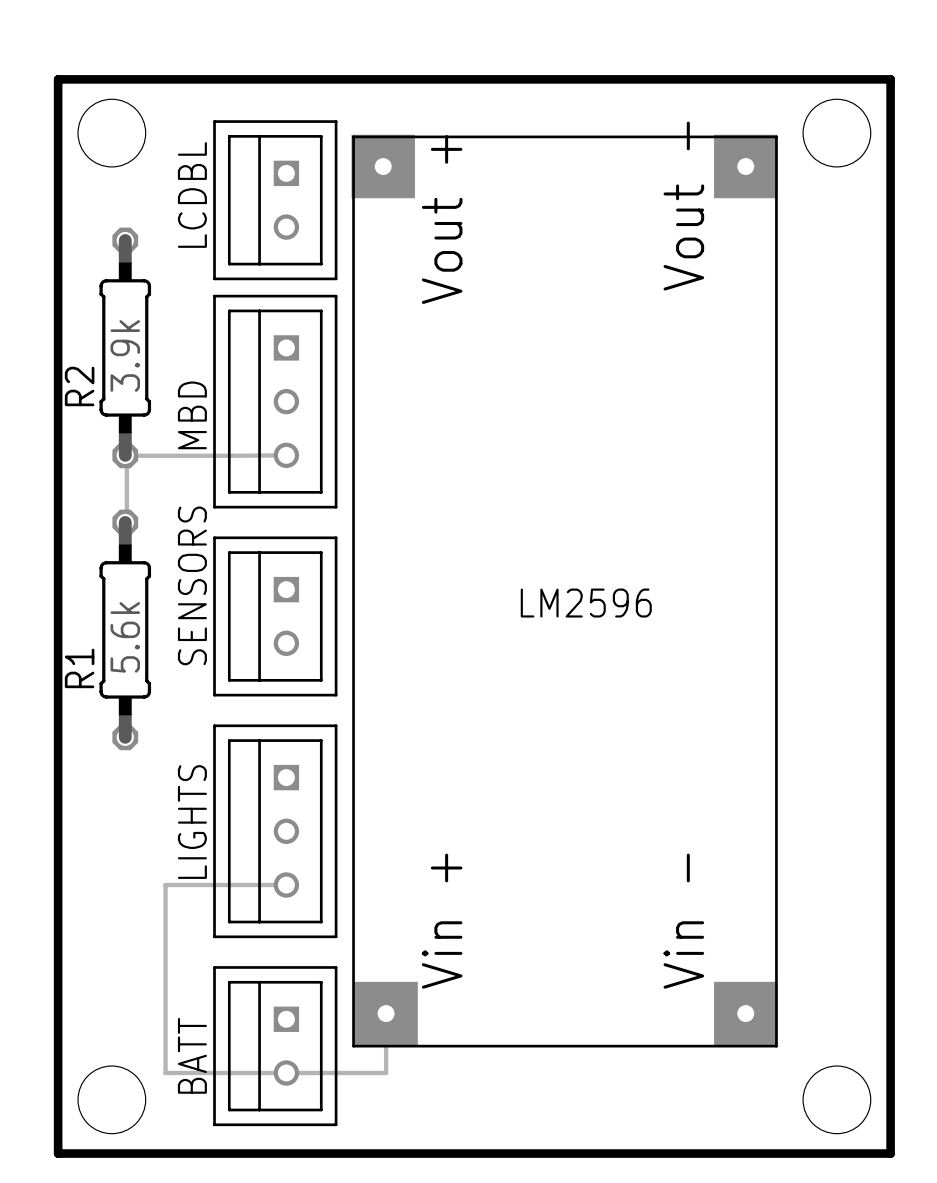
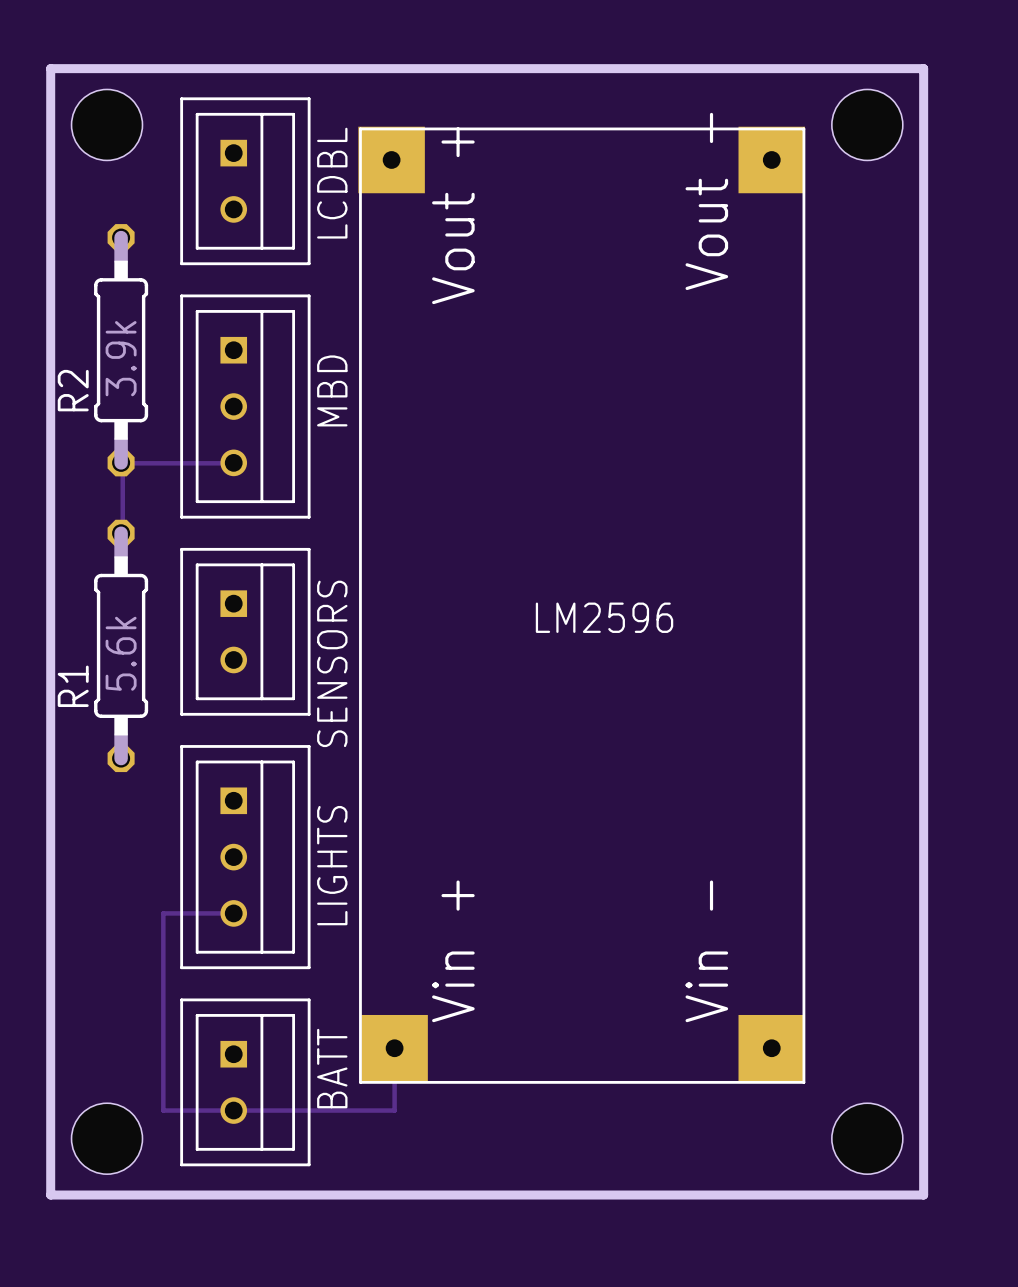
LCDBL: none -> (245, 181)
LCDBL: (275, 200) -> none
MBD: none -> (245, 406)
MBD: (275, 401) -> none
track: (286, 455) (232, 455) -> none
SENSORS: none -> (245, 631)
SENSORS: (275, 616) -> none
LIGHTS: none -> (245, 857)
LIGHTS: (275, 831) -> none
track: (232, 885) (286, 885) -> none
BATT: none -> (245, 1082)
BATT: (275, 1046) -> none

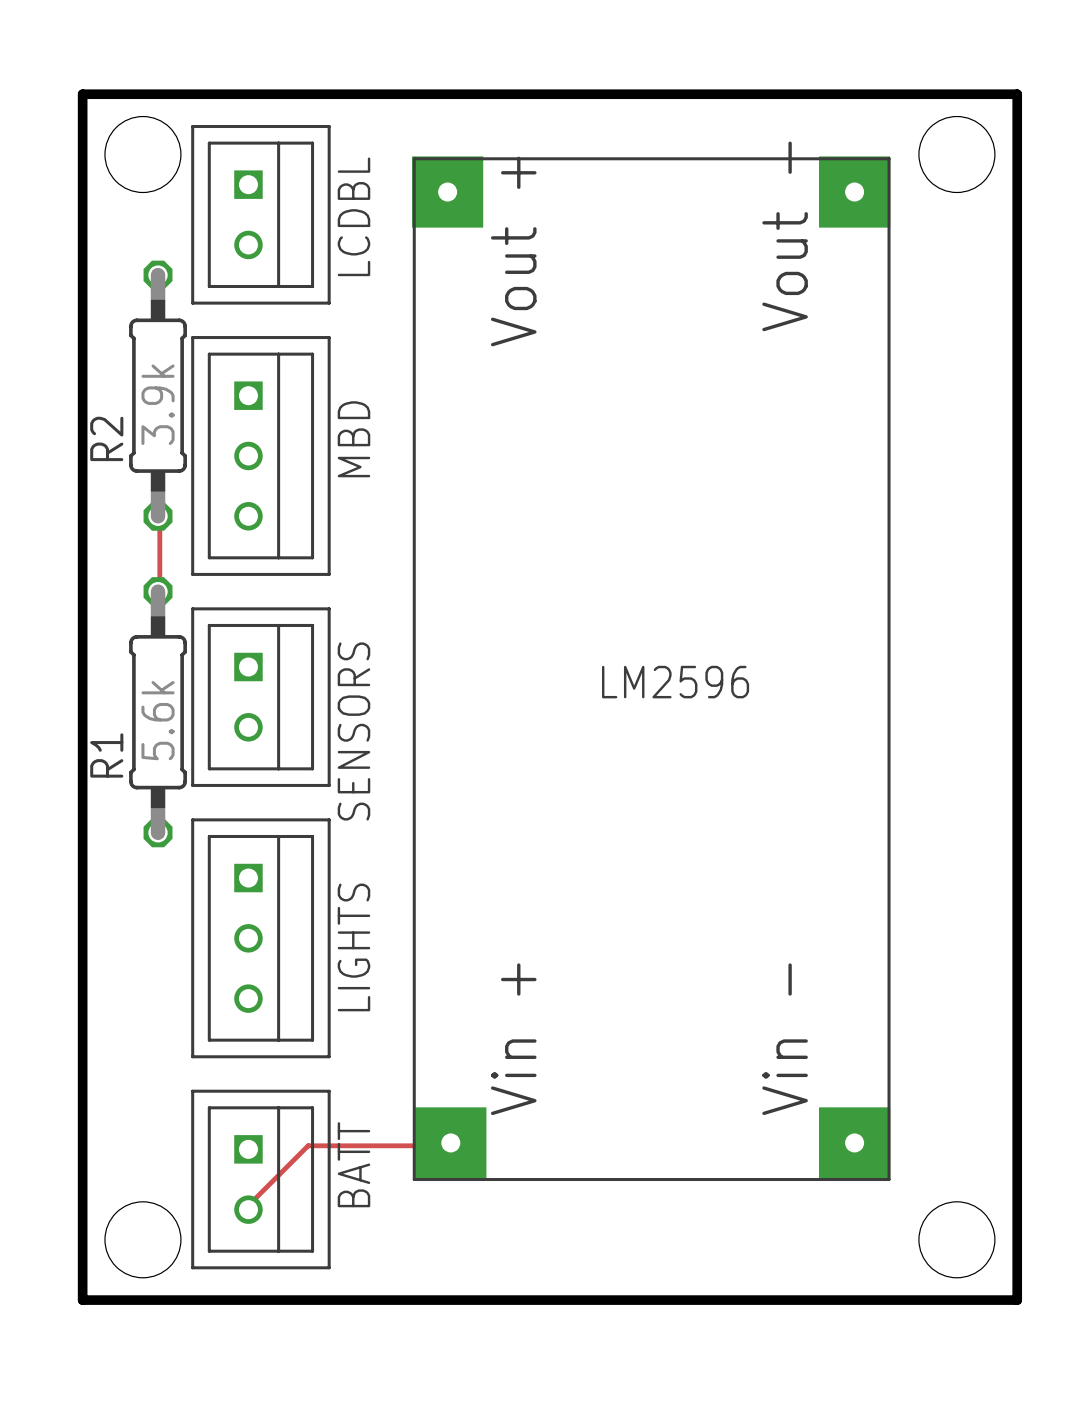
LCDBL position: (245, 181) -> (260, 214)
MBD position: (245, 406) -> (260, 455)
track: (121, 463) (233, 463) -> none
SENSORS position: (245, 631) -> (260, 697)
LIGHTS position: (245, 857) -> (260, 938)
track: (233, 913) (163, 913) (163, 1110) (394, 1110) (394, 1048) -> (248, 1209) (248, 1205) (308, 1145) (450, 1145) (450, 1142)
BATT position: (245, 1082) -> (260, 1179)

